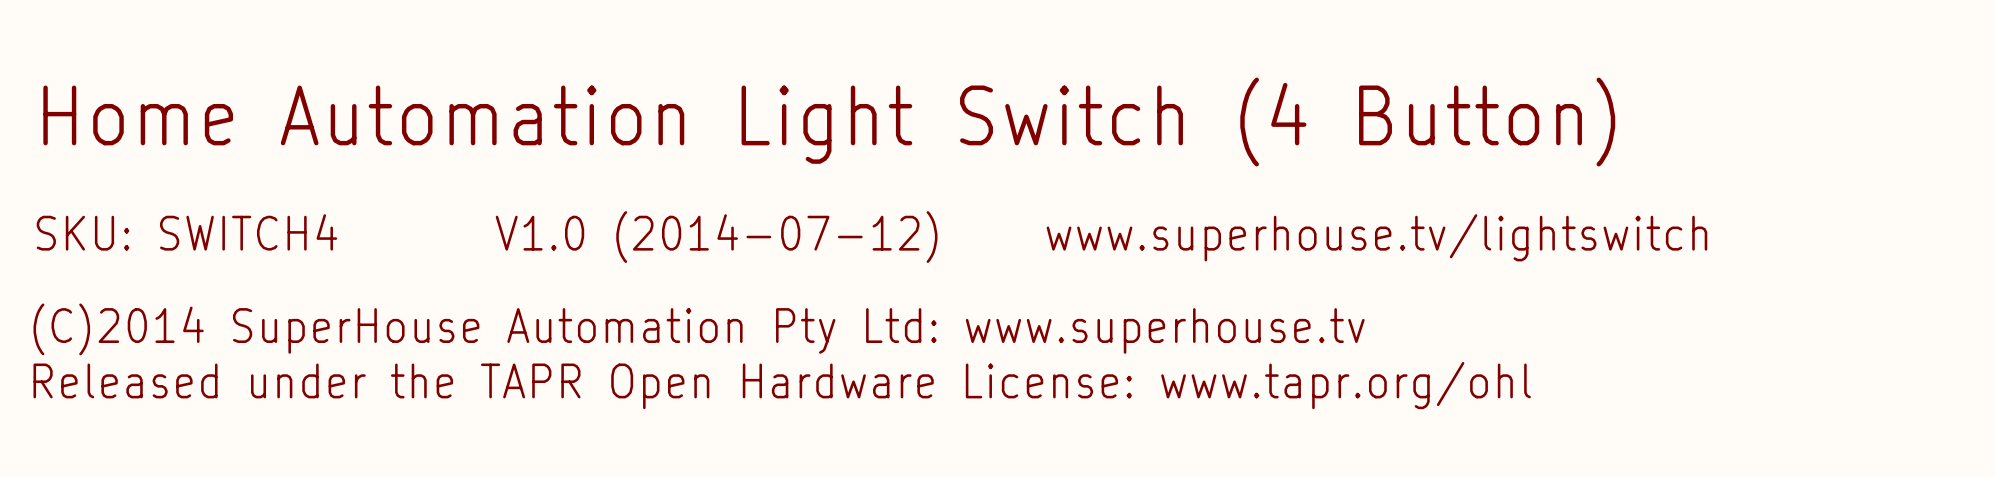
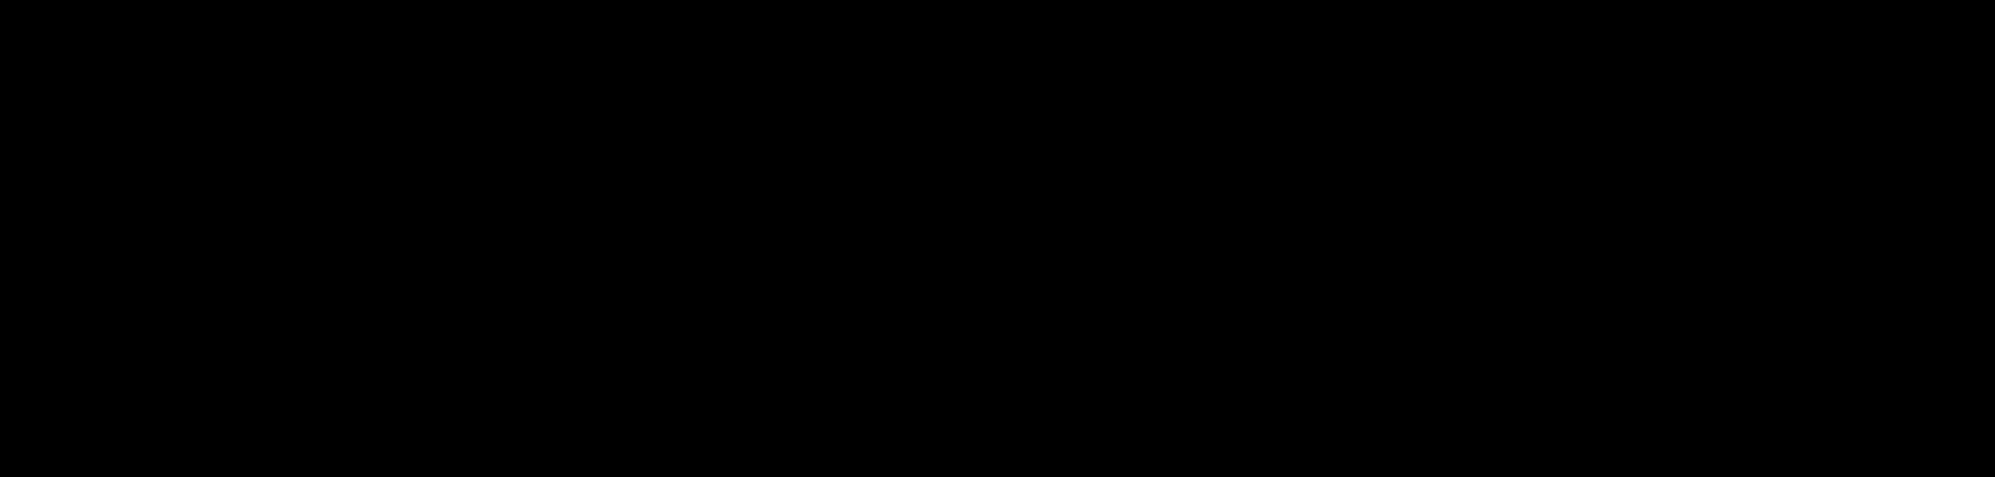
text: Home Automation Light Switch (4 Button) (829, 122) -> none
text: SKU: SWITCH4 (186, 232) -> none
text: V1.0 (2014-07-12) (716, 237) -> none
text: www.superhouse.tv/lightswitch (1376, 237) -> none
text: (C)2014 SuperHouse Automation Pty Ltd: www.superhouse.tv (699, 329) -> none
text: Released under the TAPR Open Hardware License: www.tapr.org/ohl (782, 385) -> none

